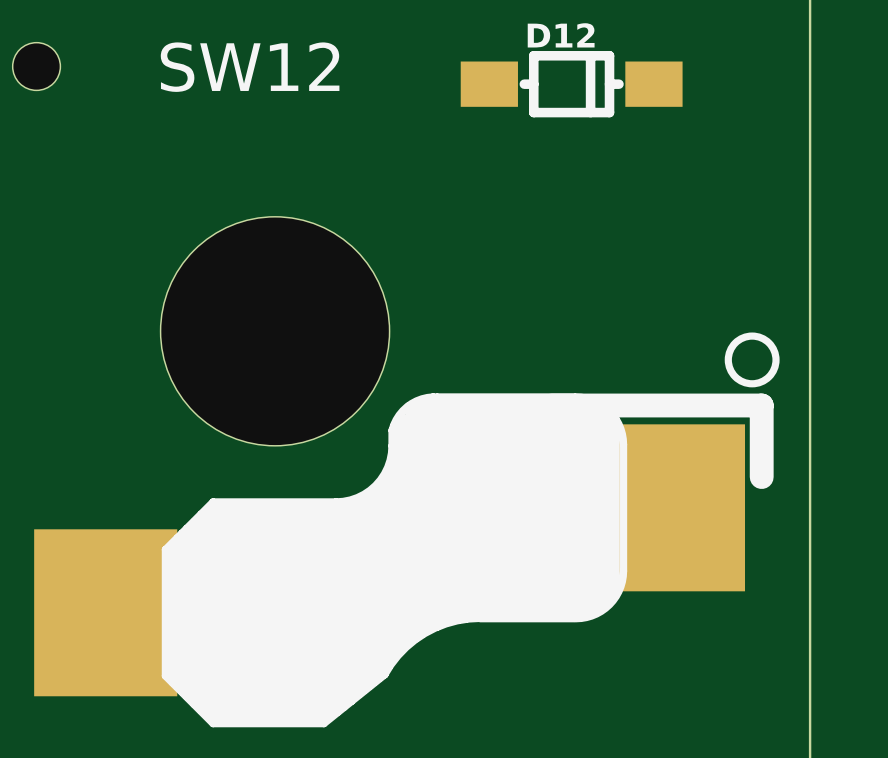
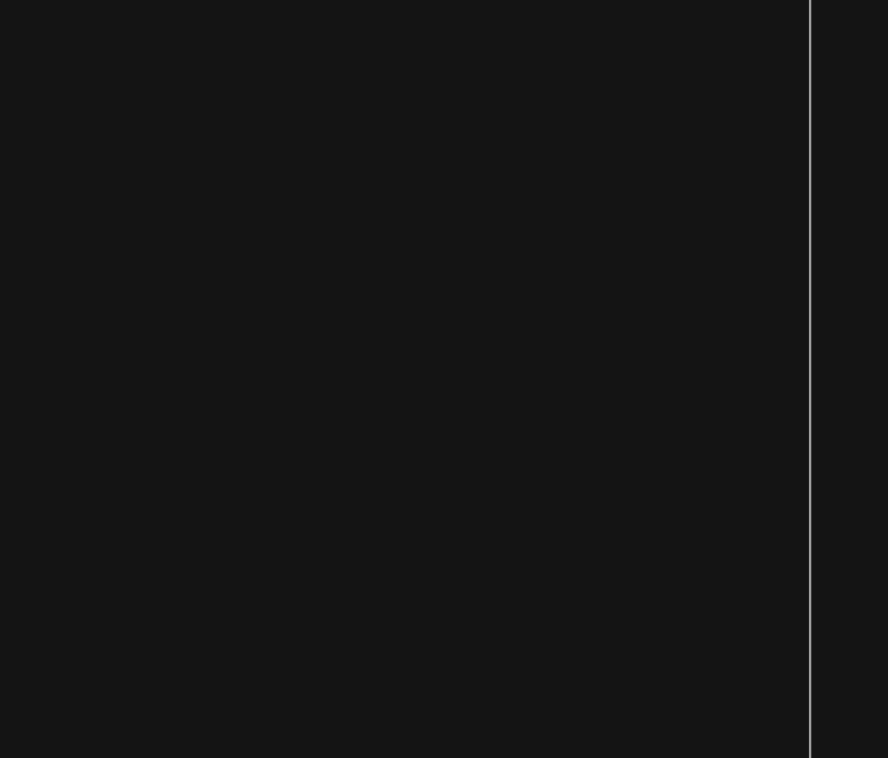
D12: (571, 84) -> none
SW12: (396, 384) -> none

